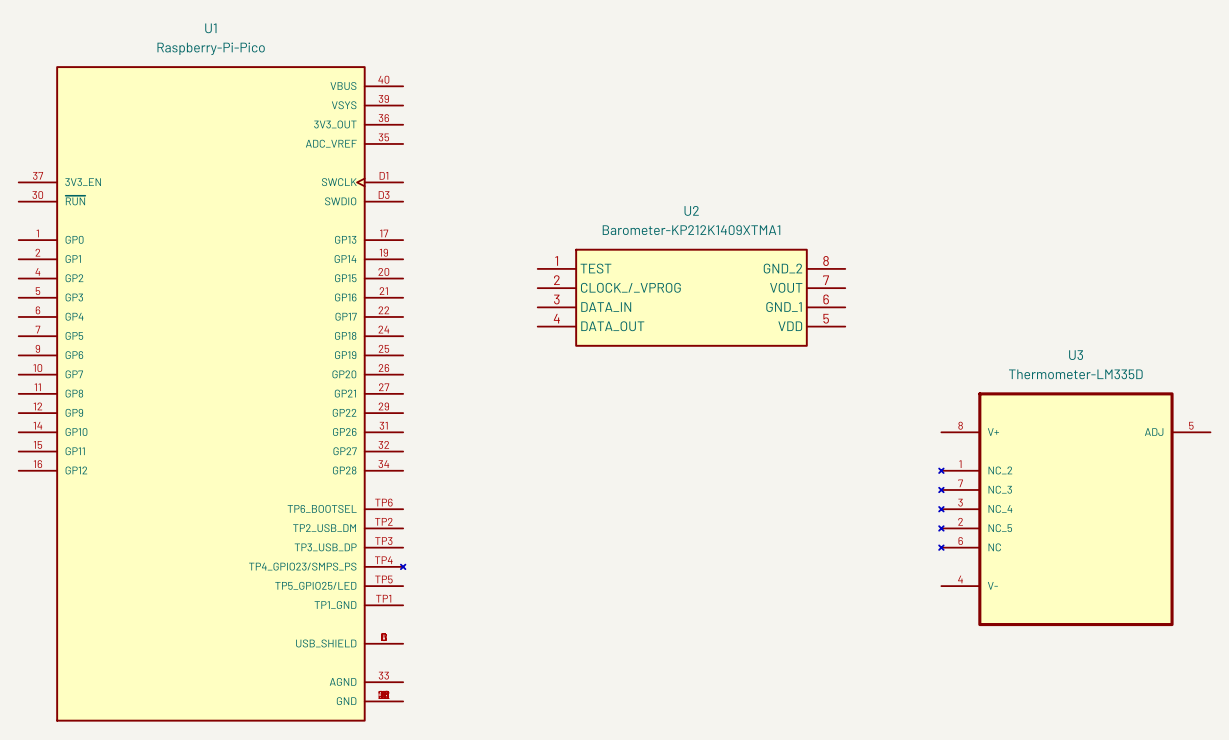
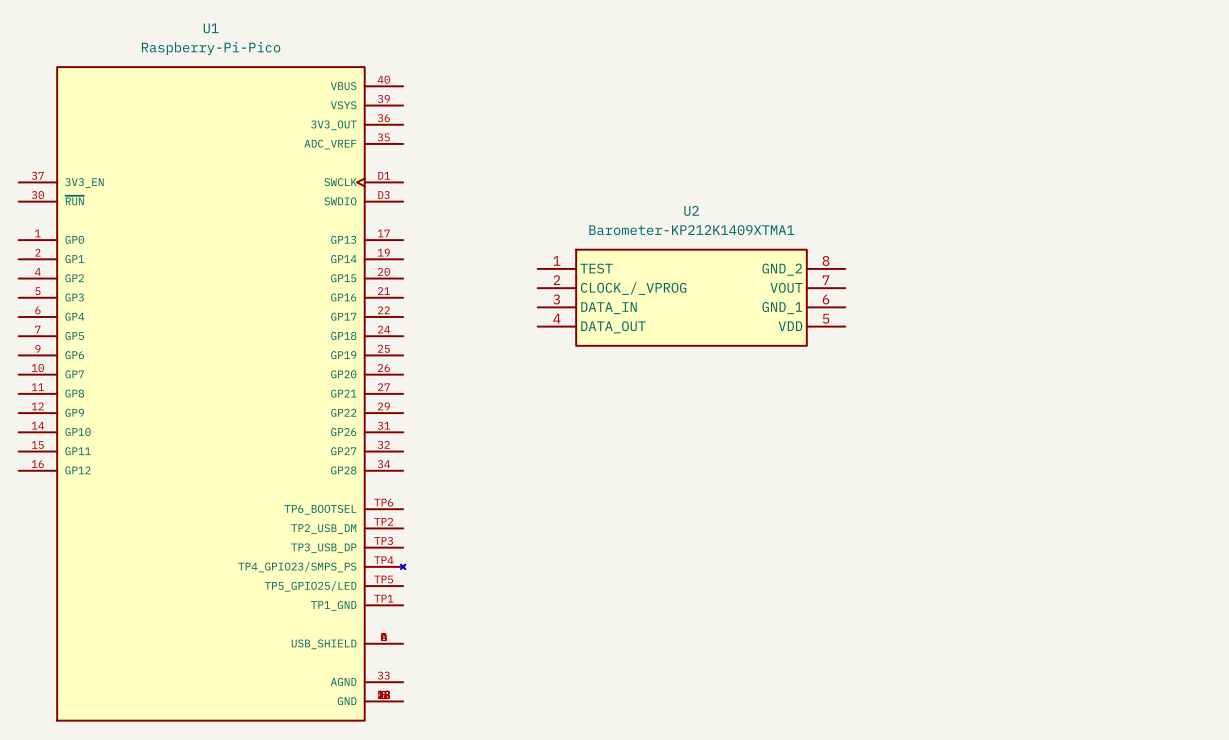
U3: Thermometer-LM335D (1074, 509) -> none

